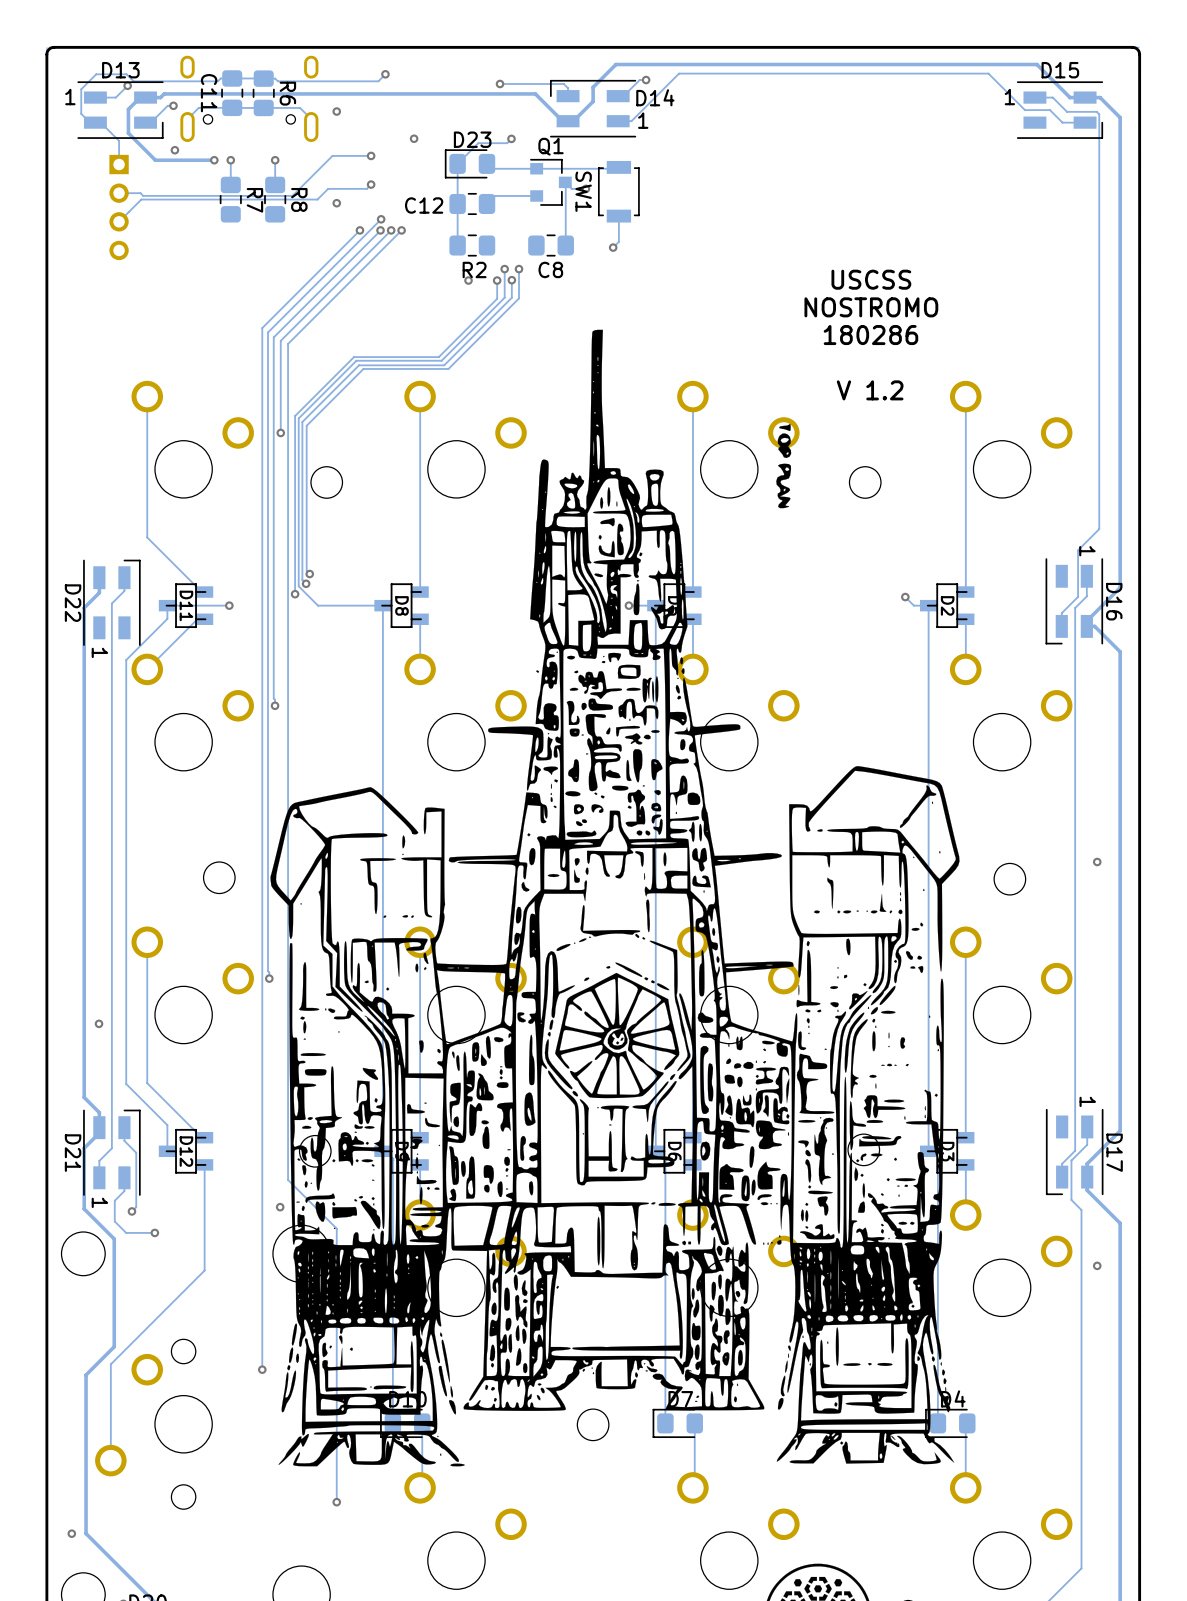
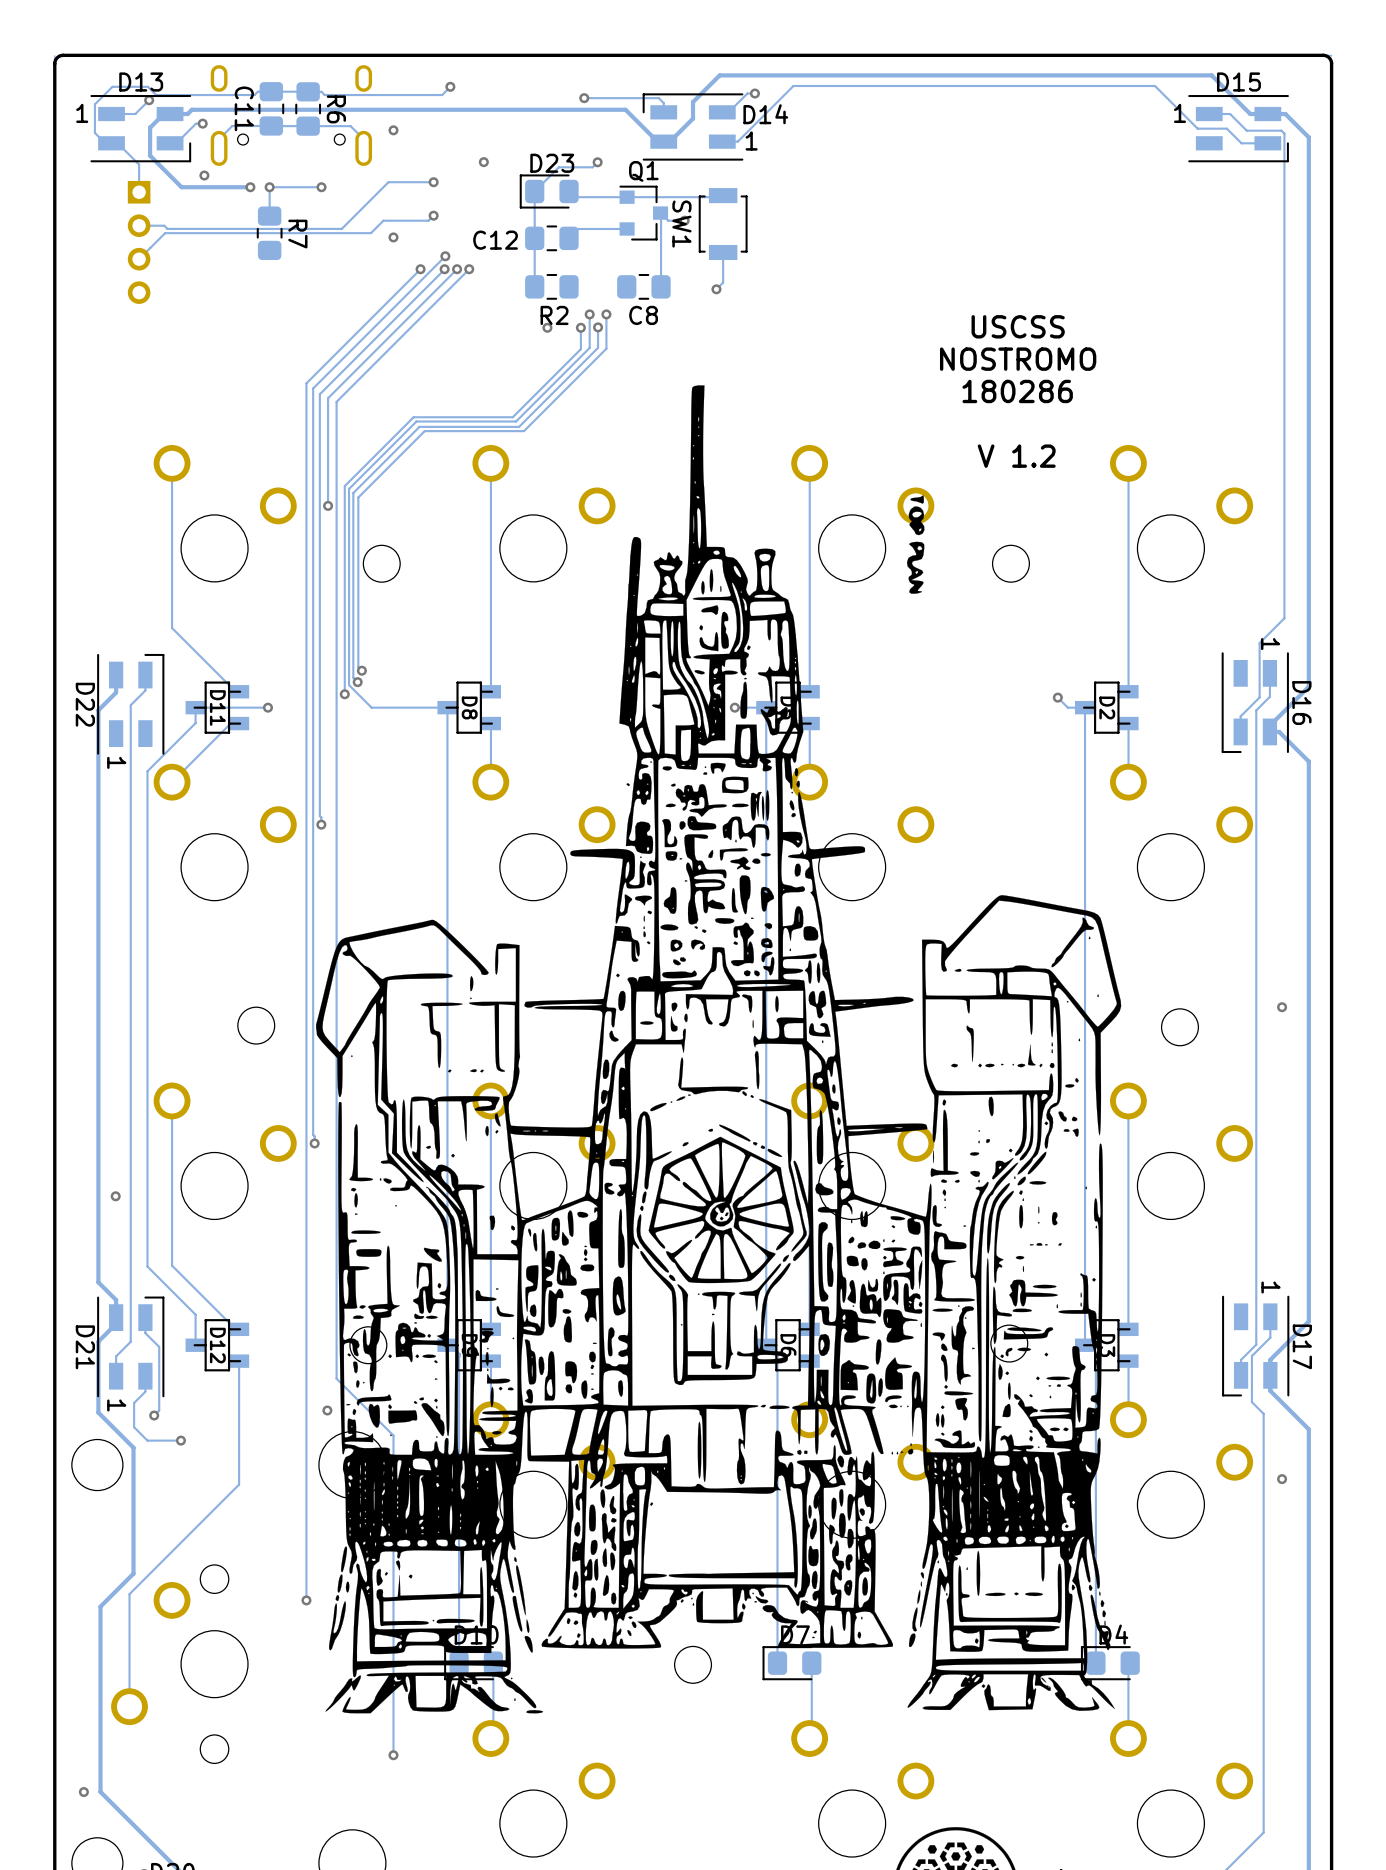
track: (275, 160) (275, 184) -> (321, 187) (269, 187)
R8: (275, 199) -> none

